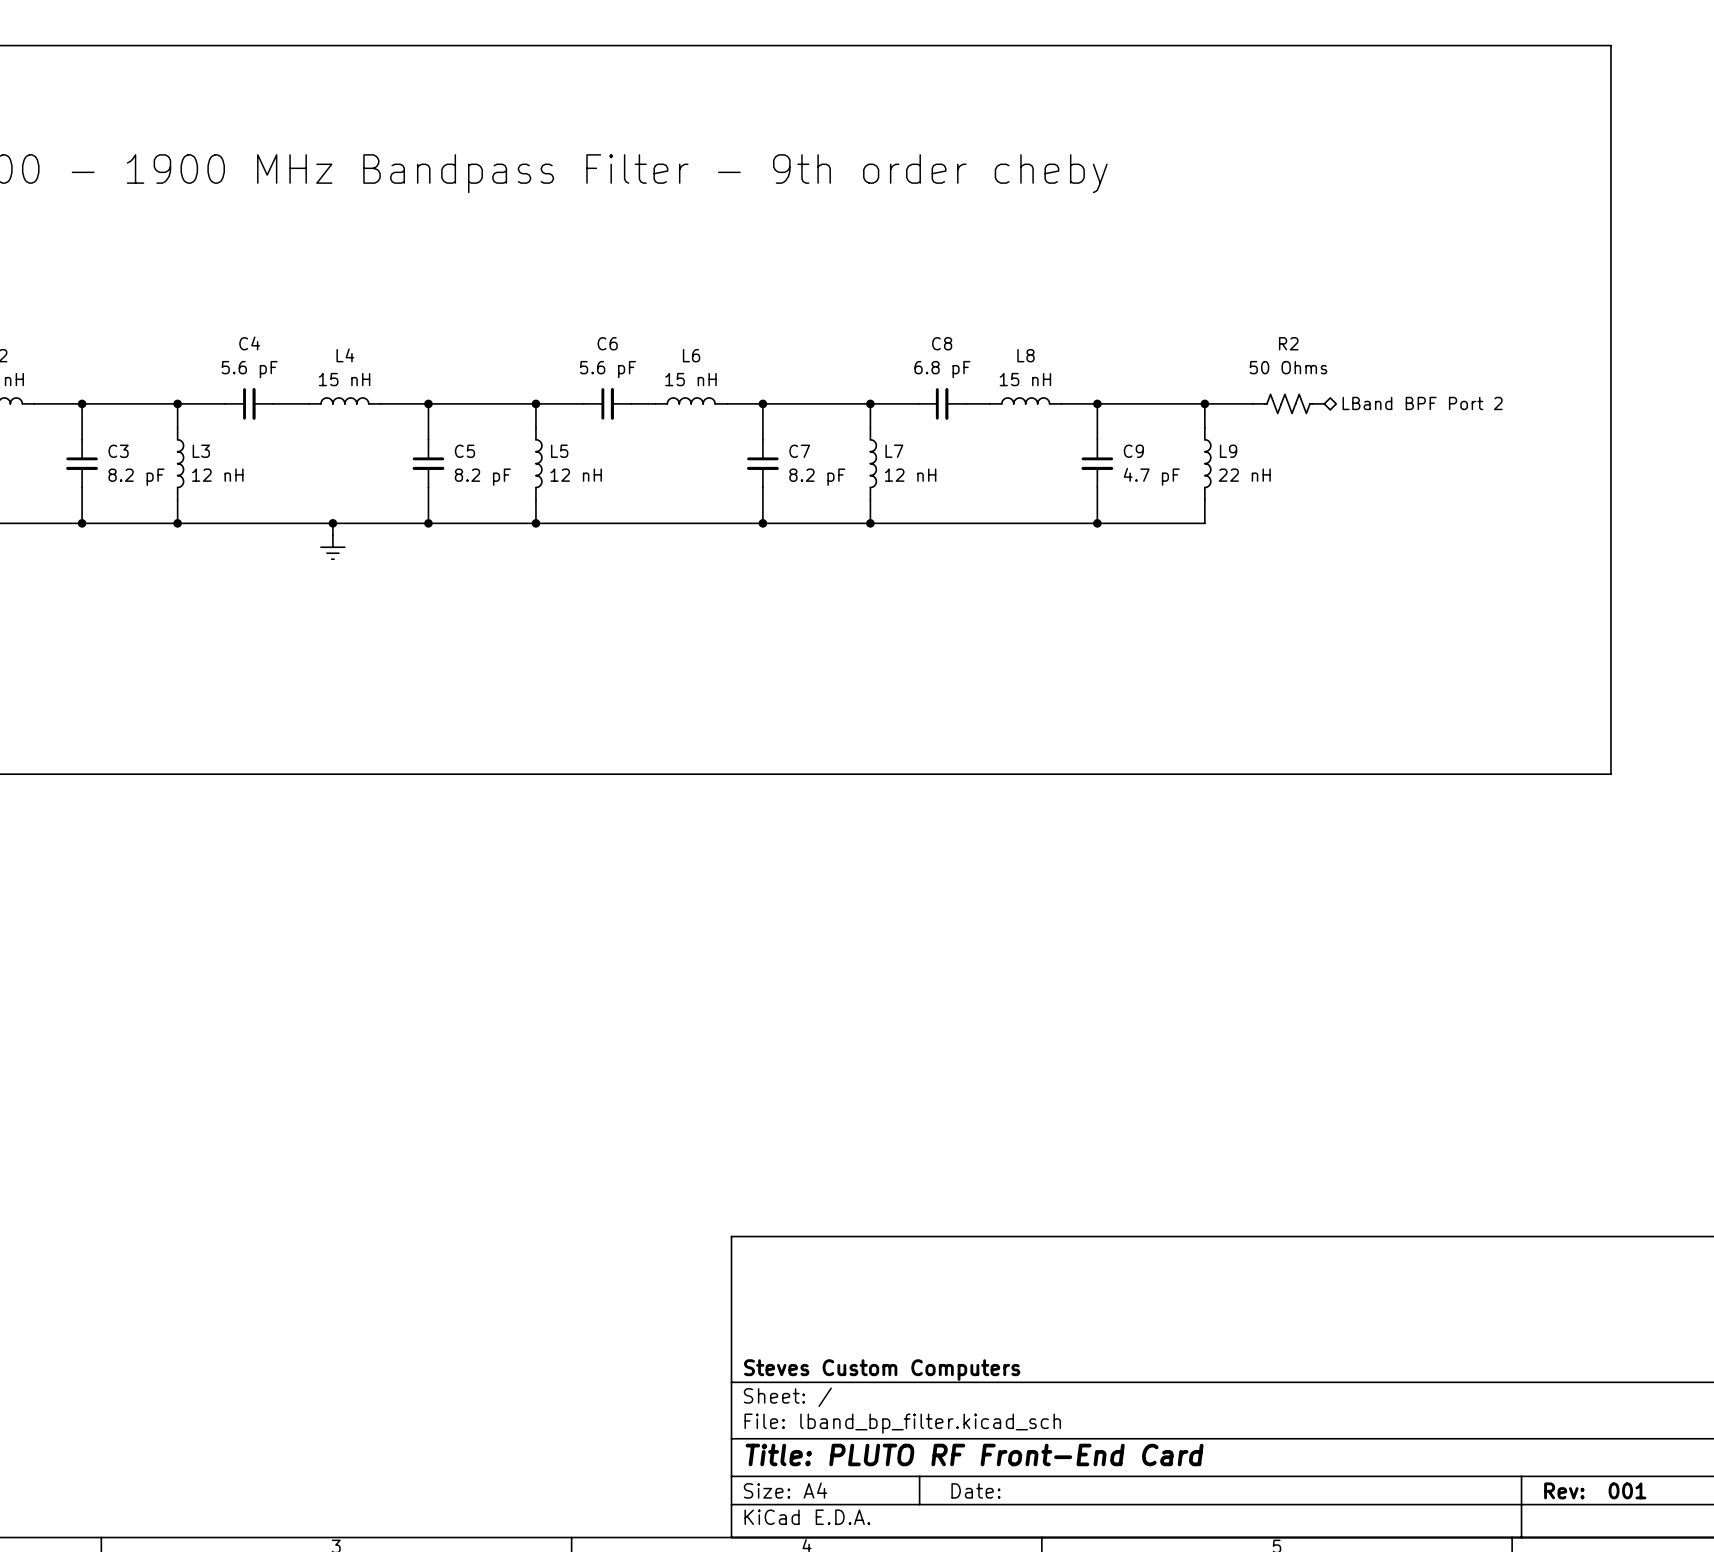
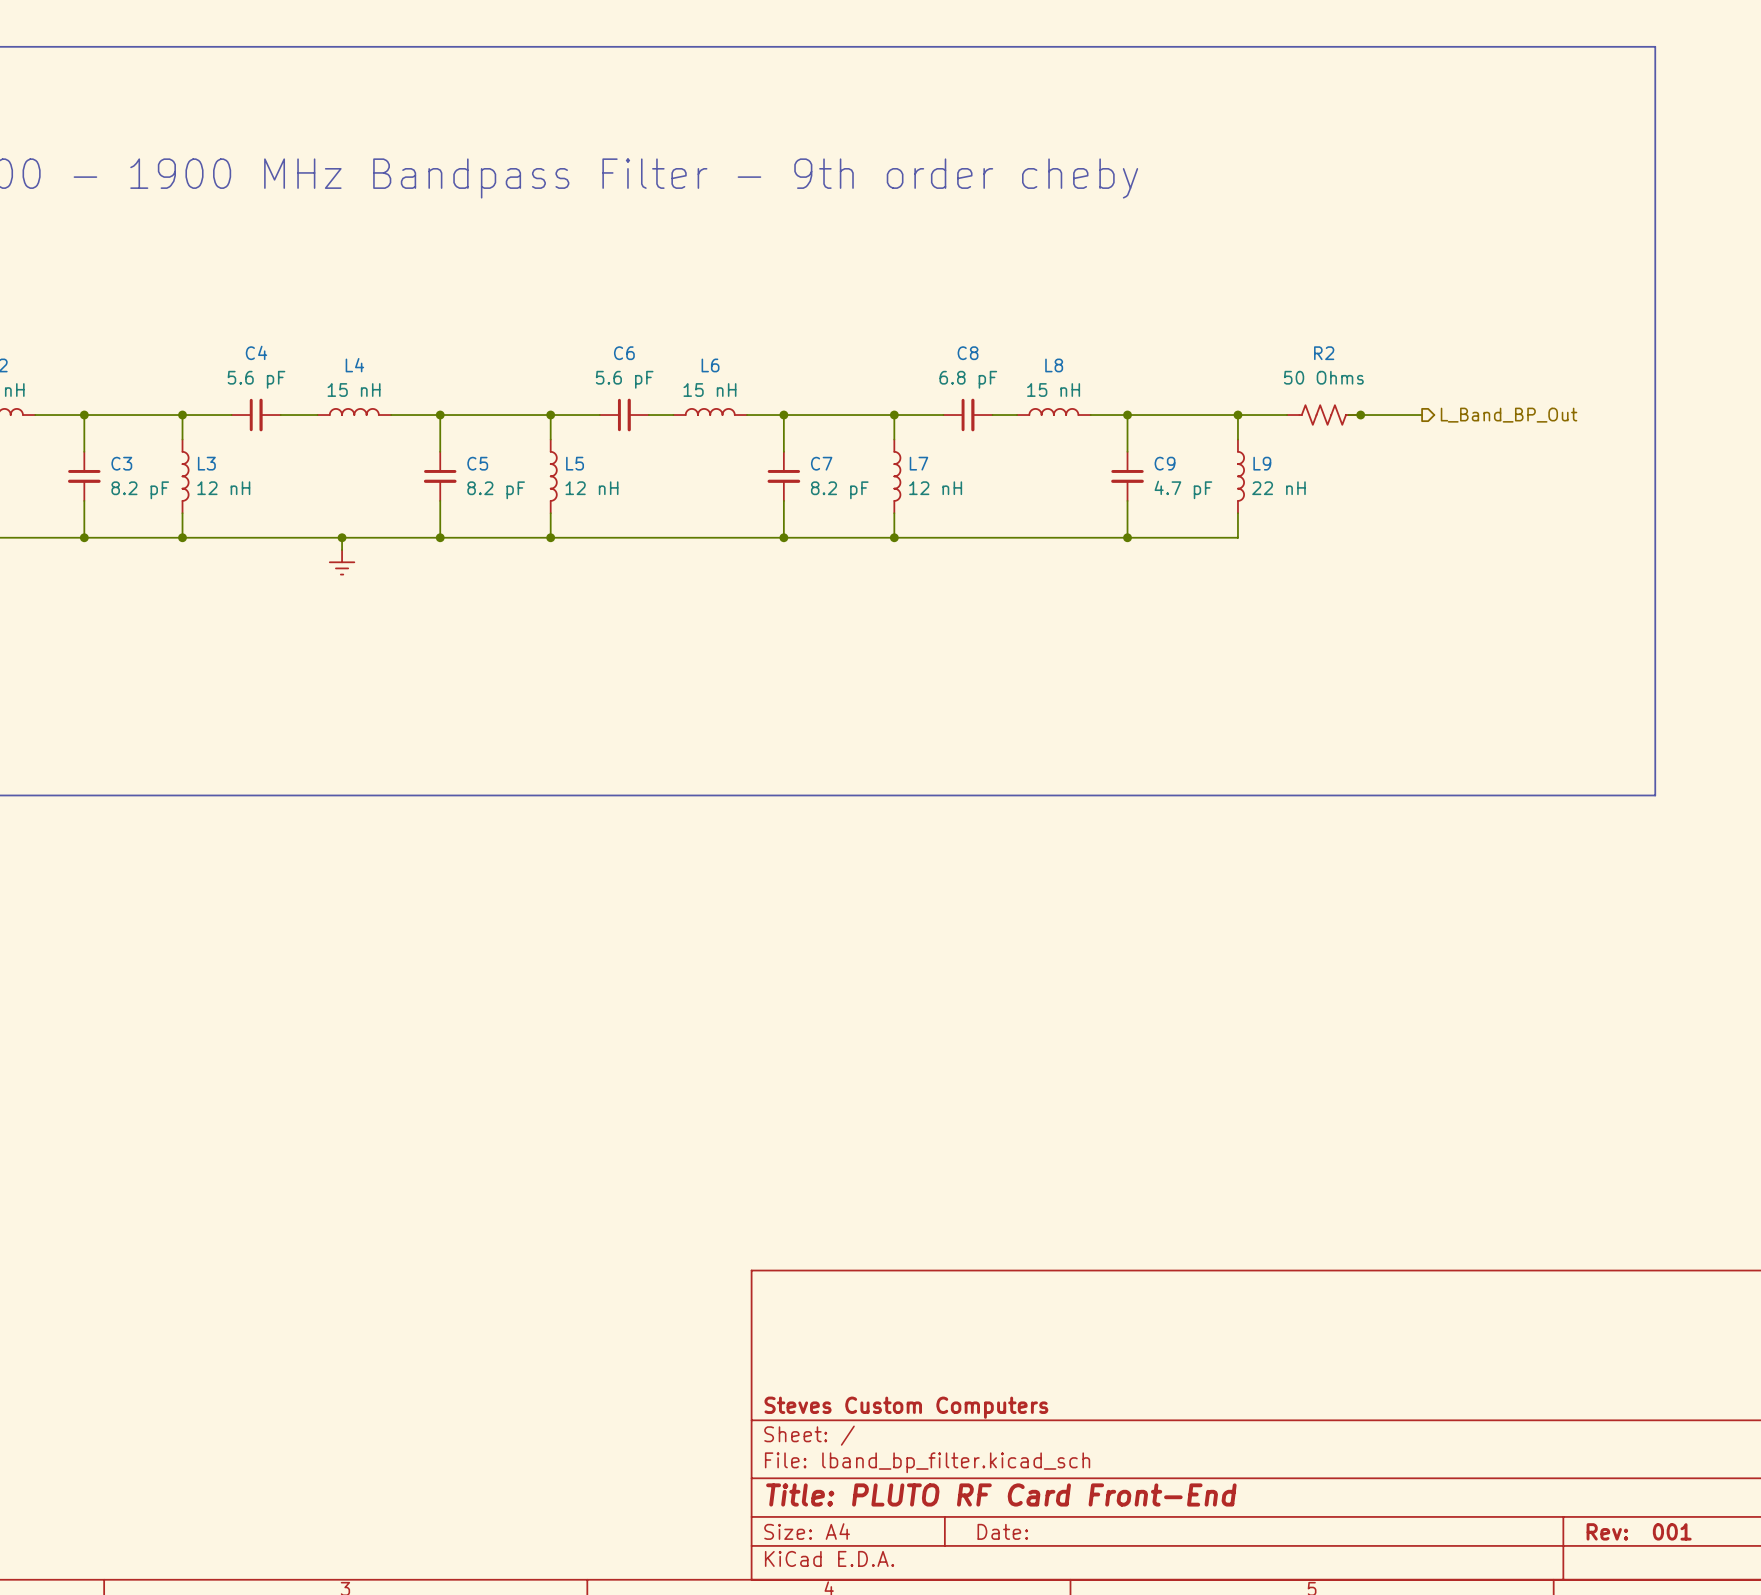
wire: none -> (1348, 415) (1422, 415)
junction: none -> (1360, 415)
hierarchical label: LBand BPF Port 2 (1422, 403) -> none
hierarchical label: none -> L_Band_BP_Out (1509, 415)
title block: Title: PLUTO RF Front-End Card (974, 1454) -> Title: PLUTO RF Card Front-End (1001, 1494)

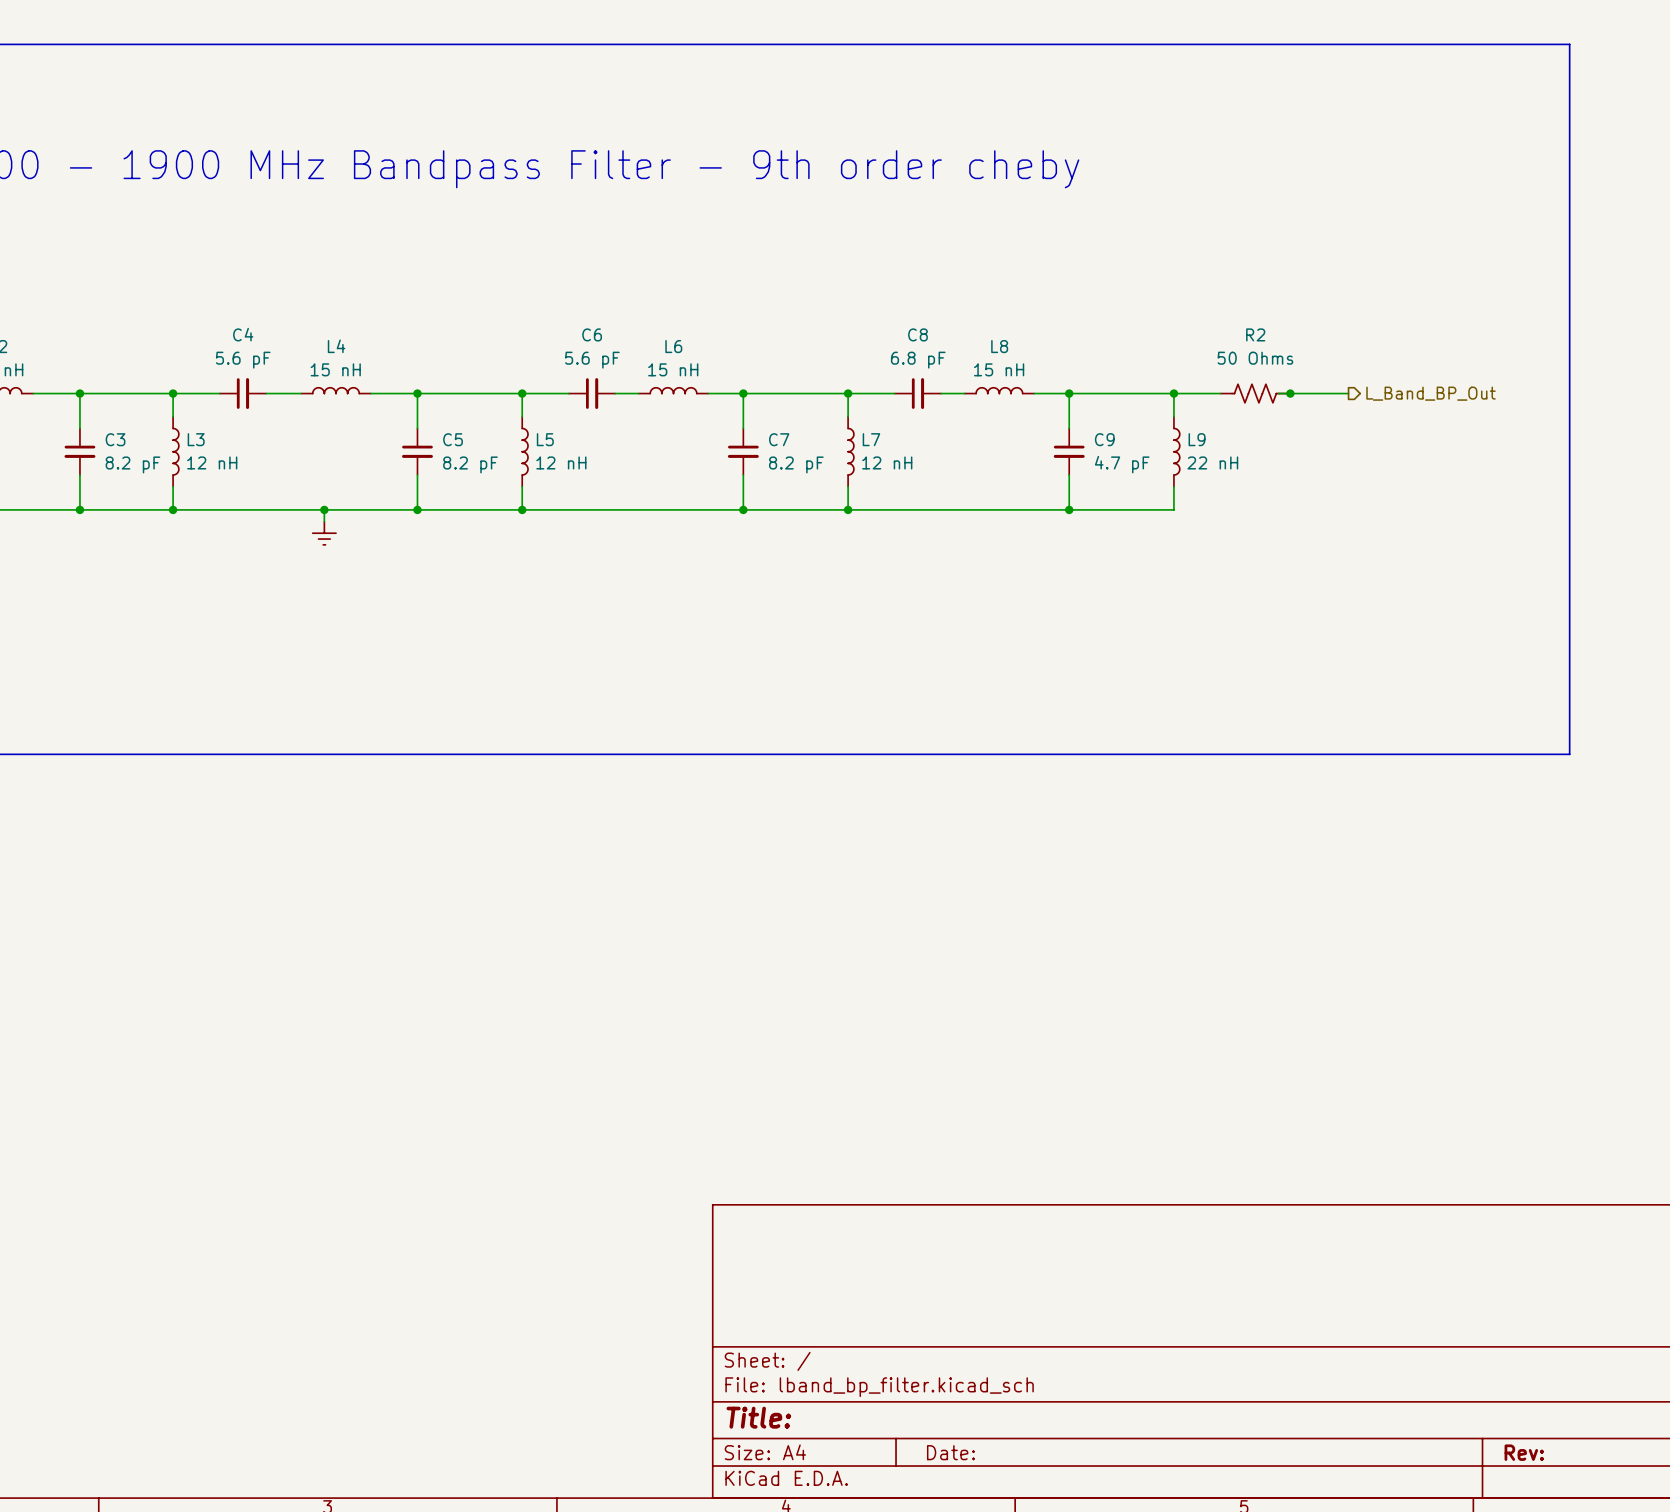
title block: Steves Custom Computers (906, 1407) -> none
title block: Title: PLUTO RF Card Front-End (1001, 1494) -> Title: (758, 1417)
title block: Rev: 001 (1639, 1531) -> Rev: (1524, 1452)

